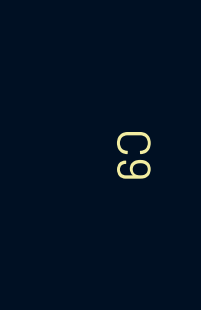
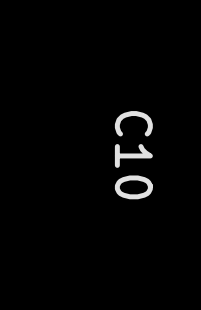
C9 name: C9 (133, 155) -> C10 (133, 155)

